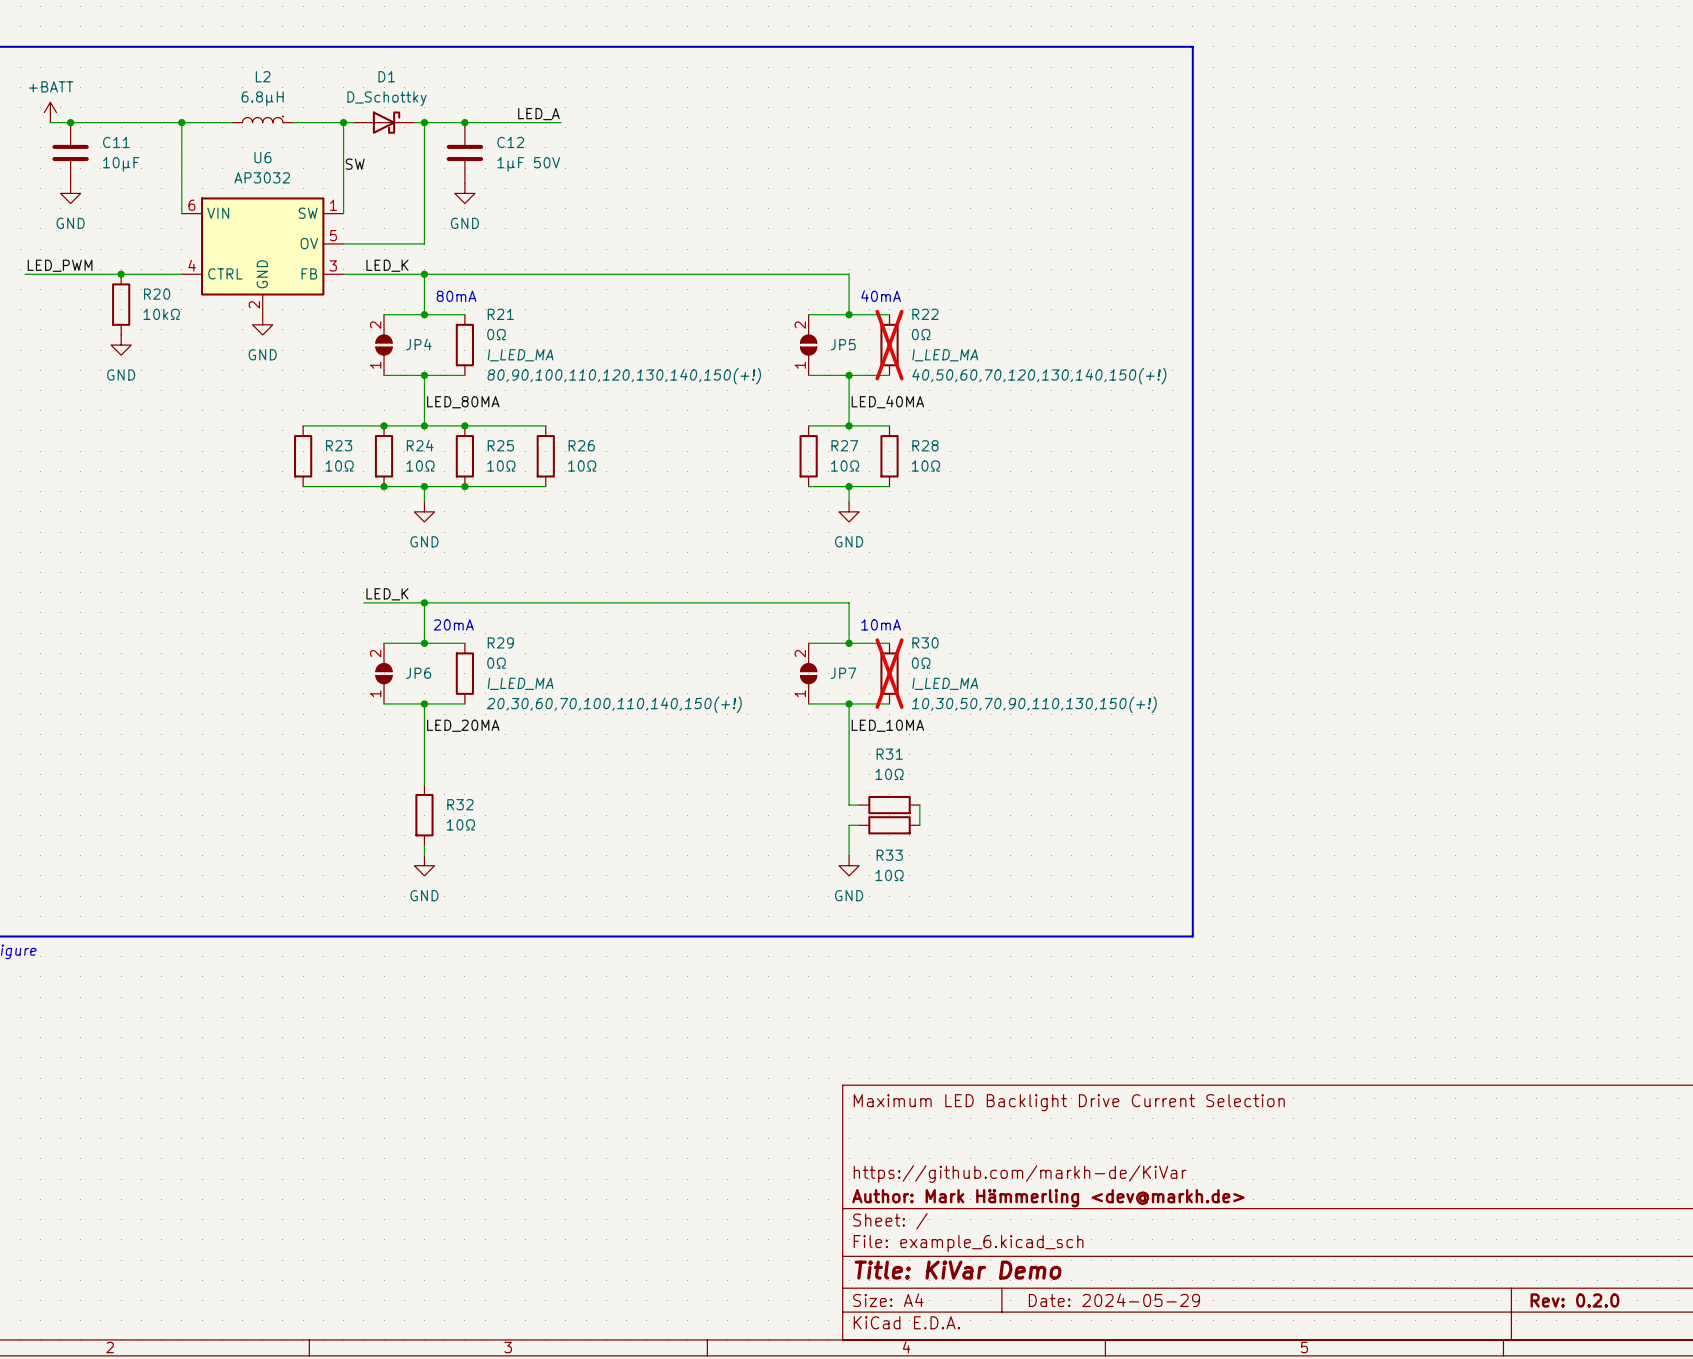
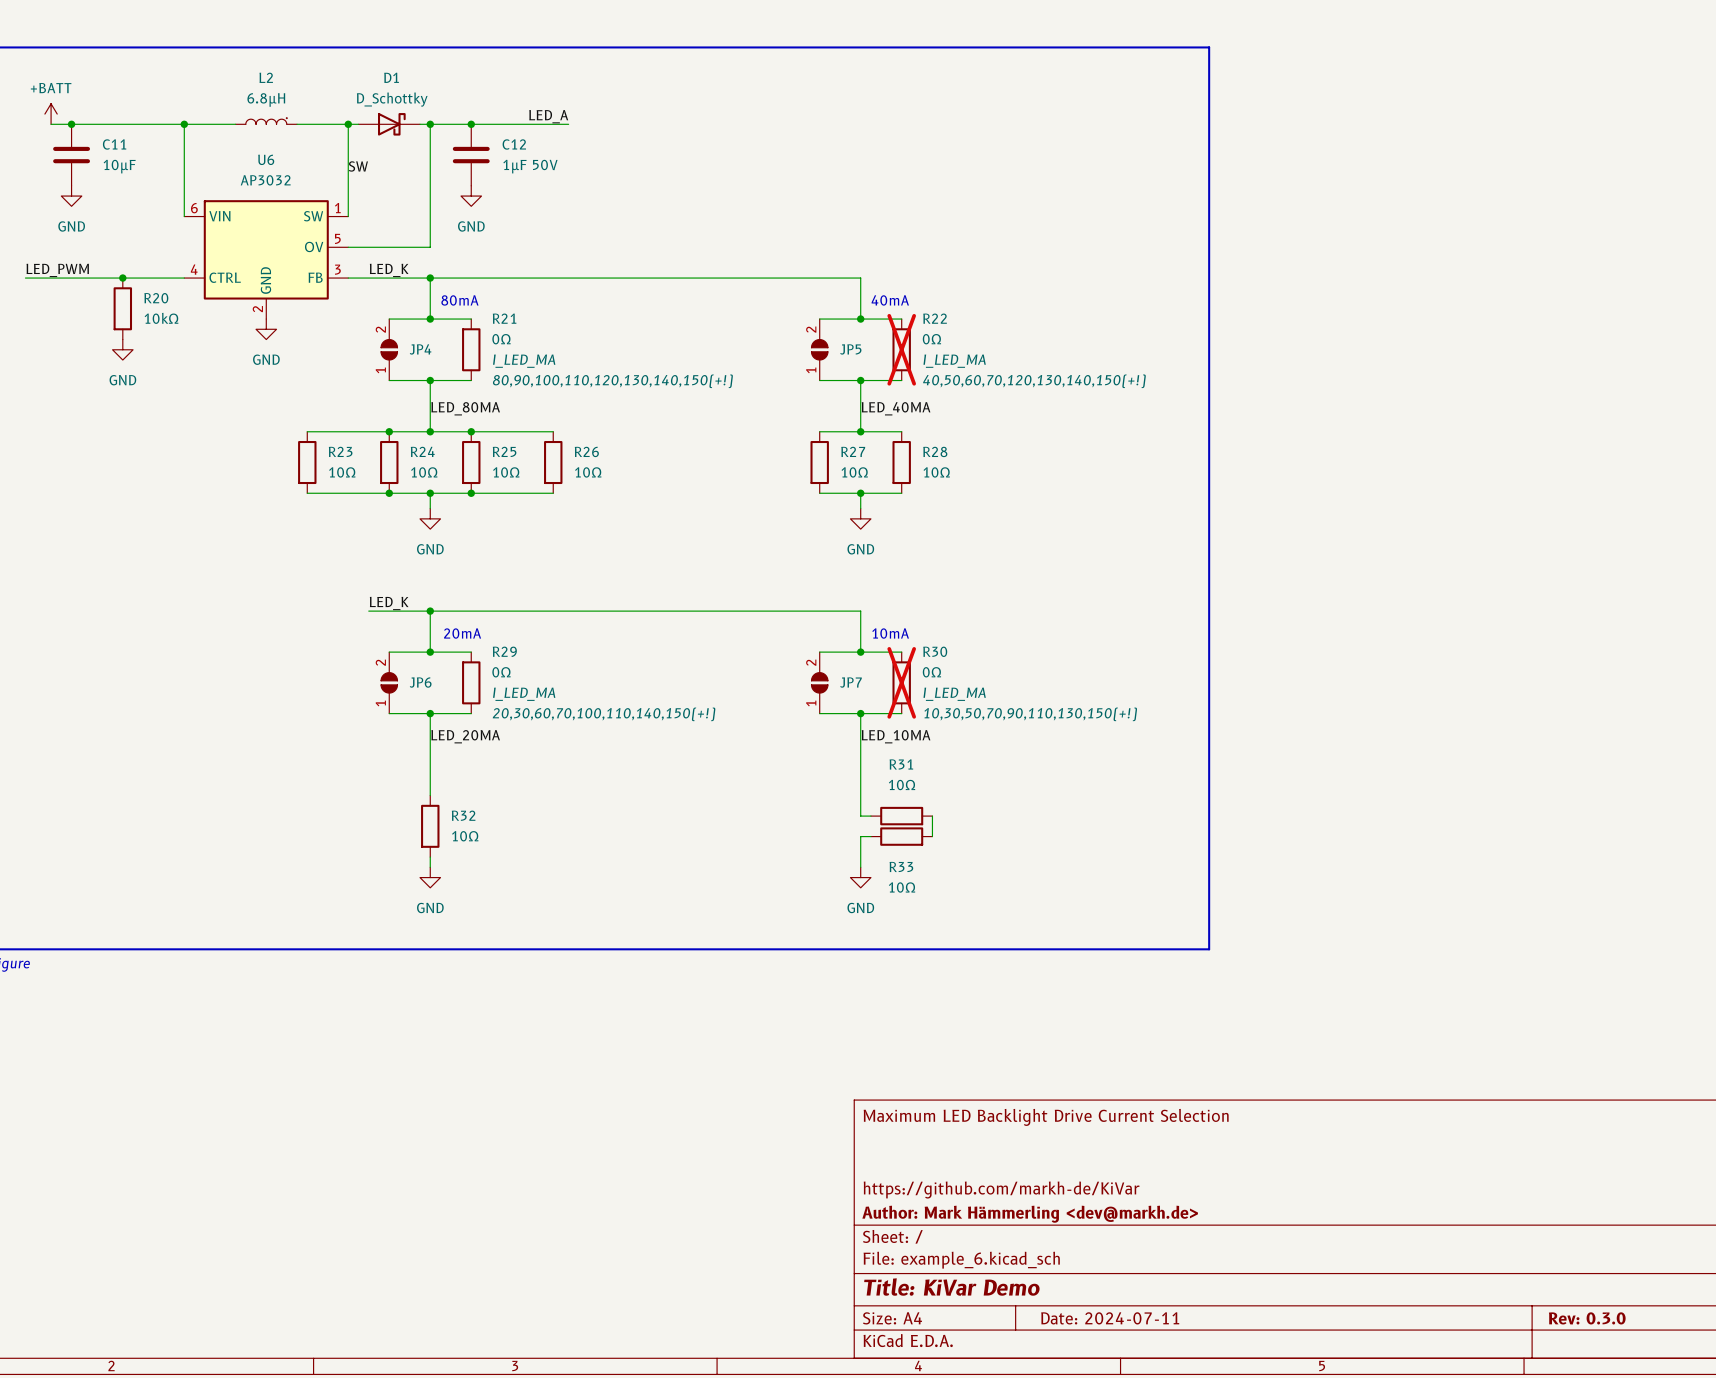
title block: Date: 2024-05-29 (1114, 1300) -> Date: 2024-07-11 (1110, 1318)
title block: Rev: 0.2.0 (1574, 1300) -> Rev: 0.3.0 (1587, 1318)

